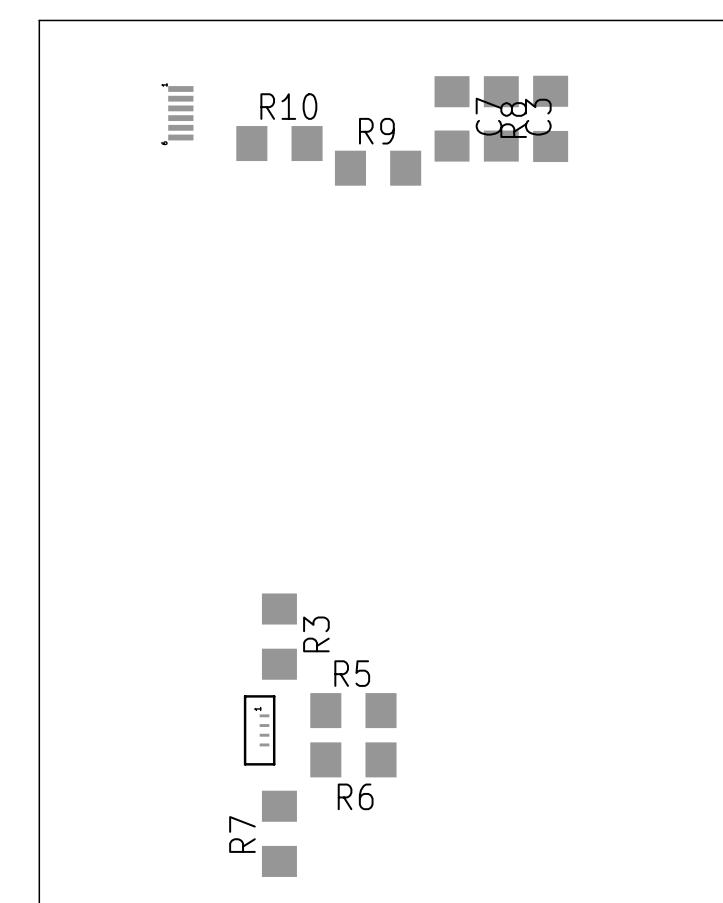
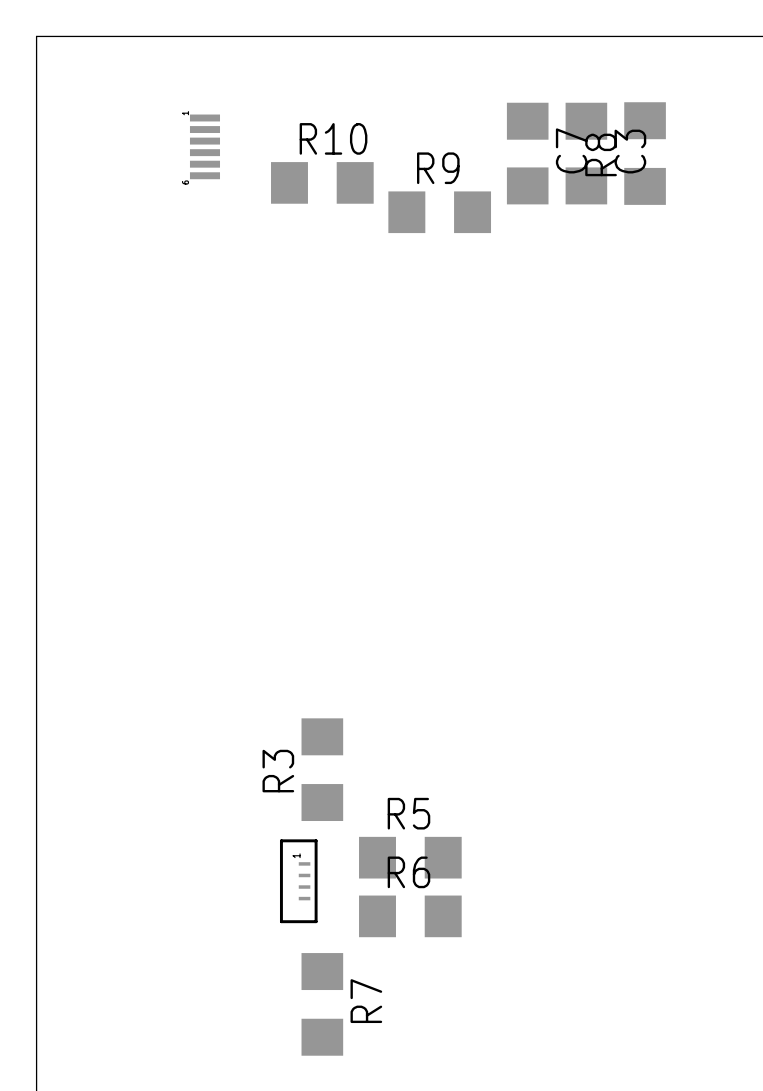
R3 name position: R3 (316, 634) -> R3 (278, 771)
R6 name position: R6 (355, 796) -> R6 (408, 872)
R7 name position: R7 (242, 834) -> R7 (366, 1001)

